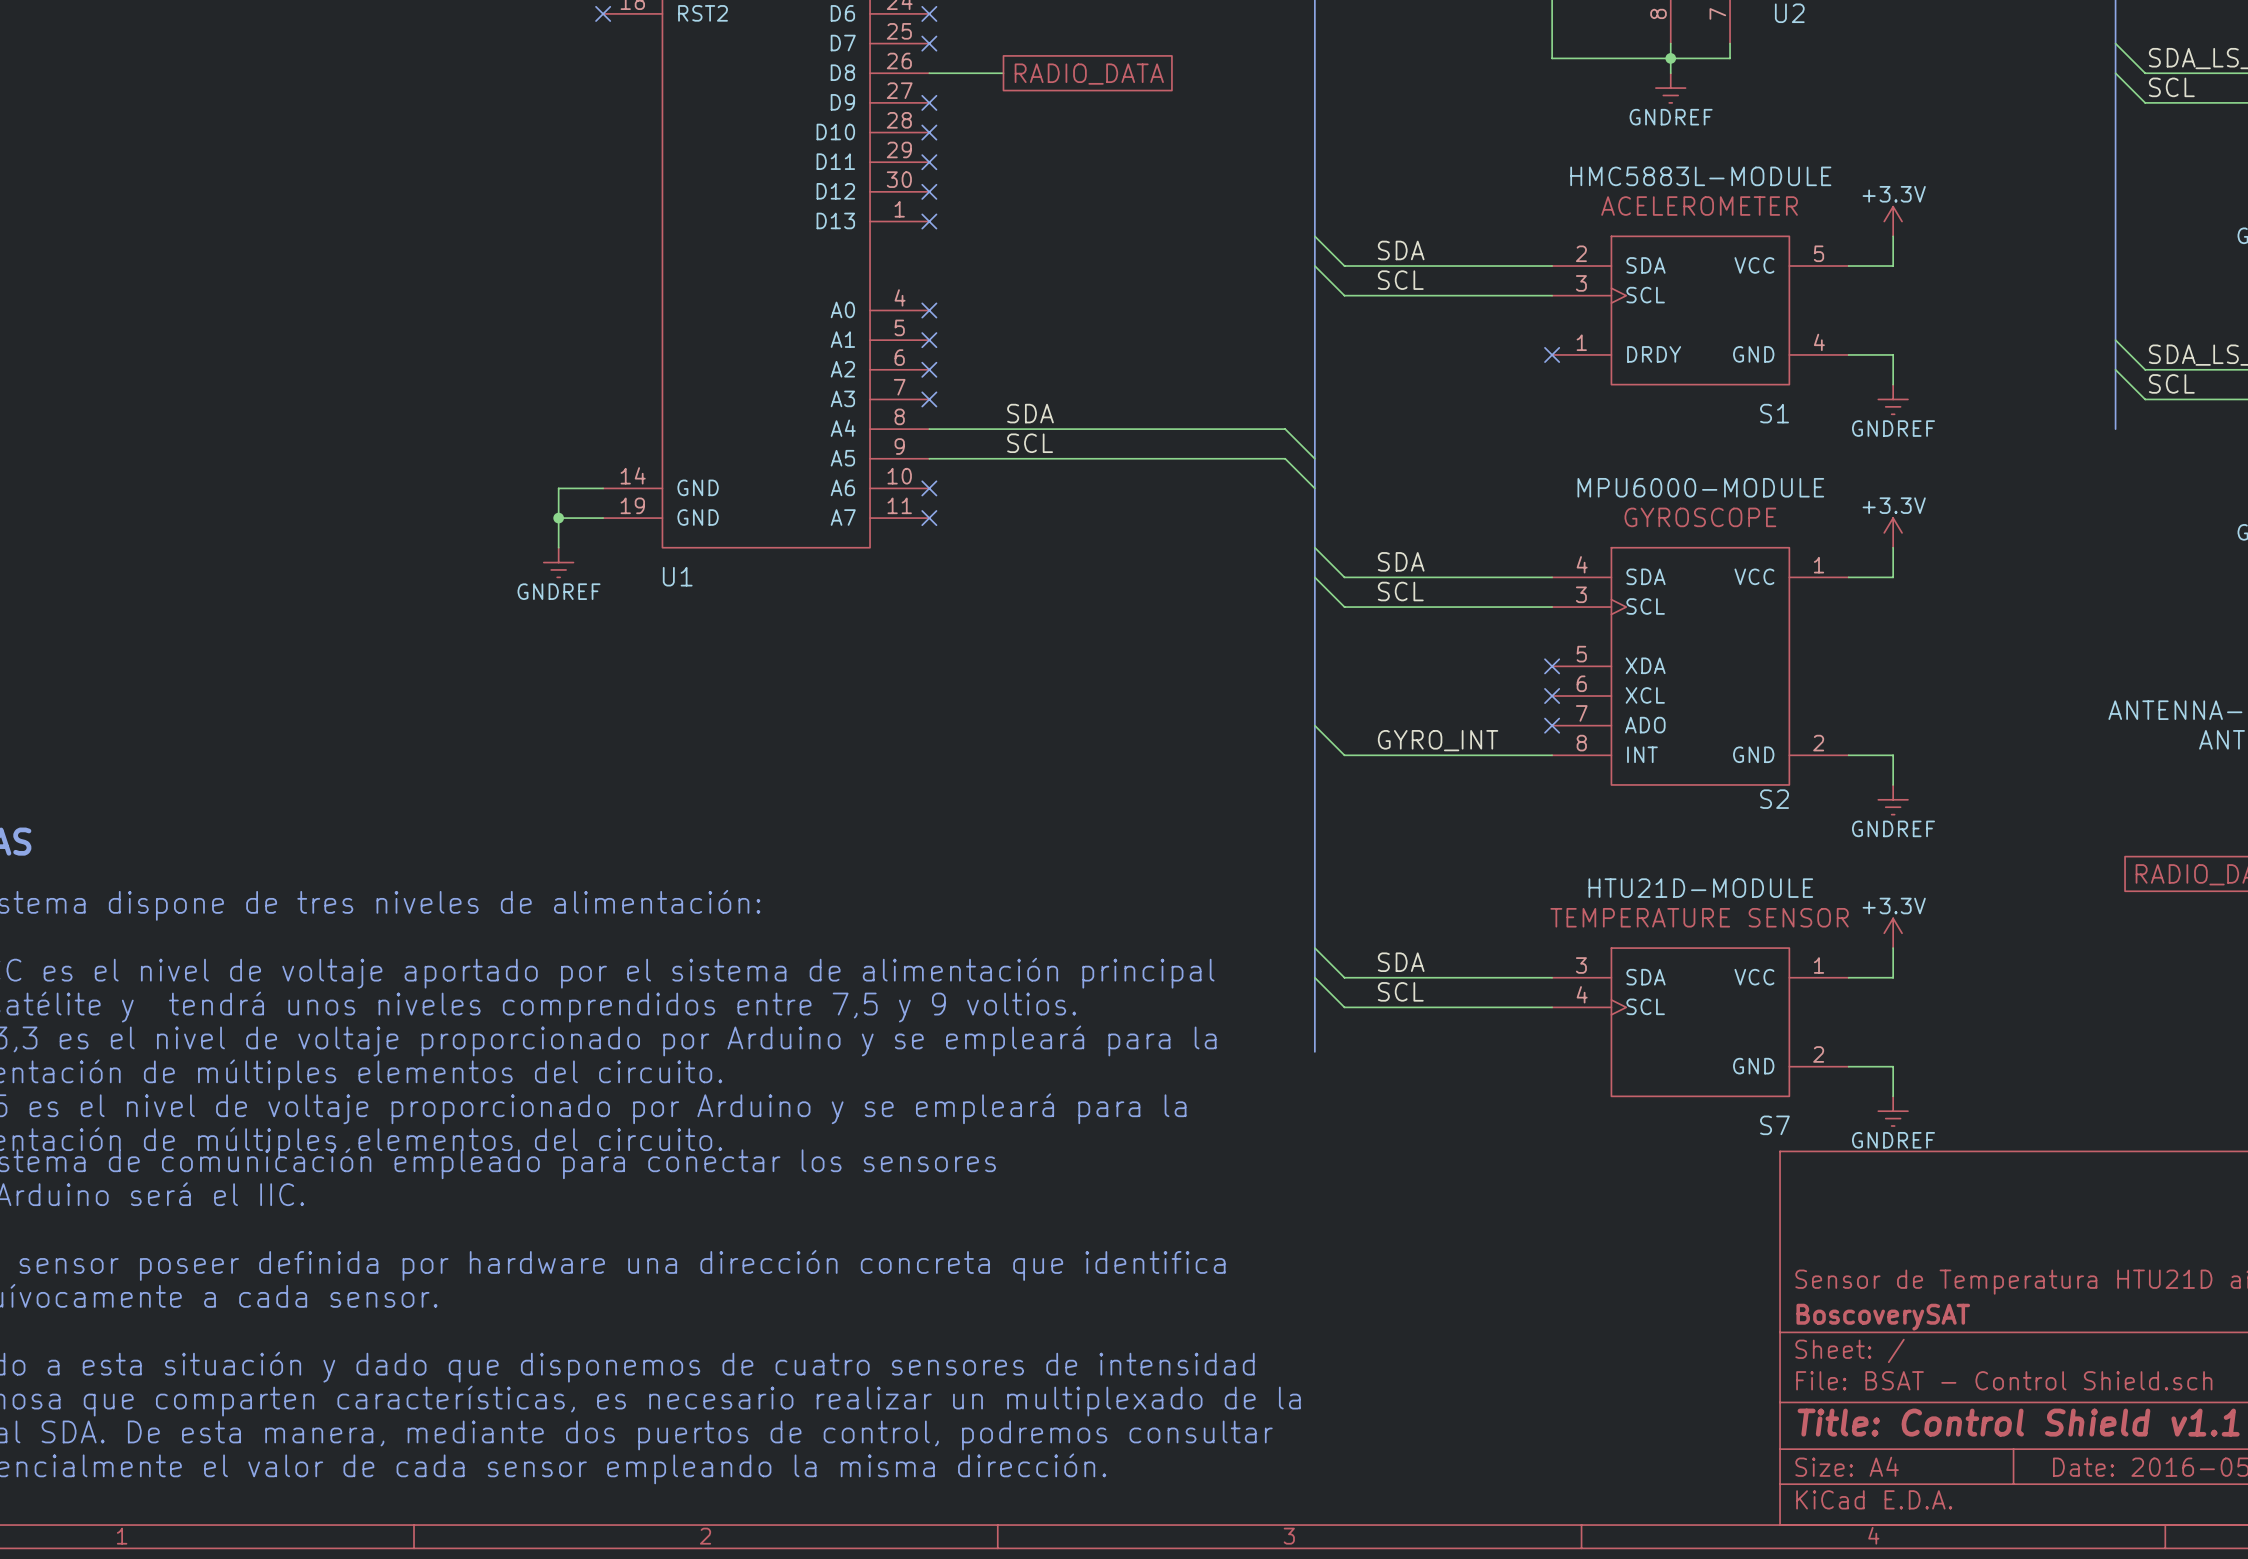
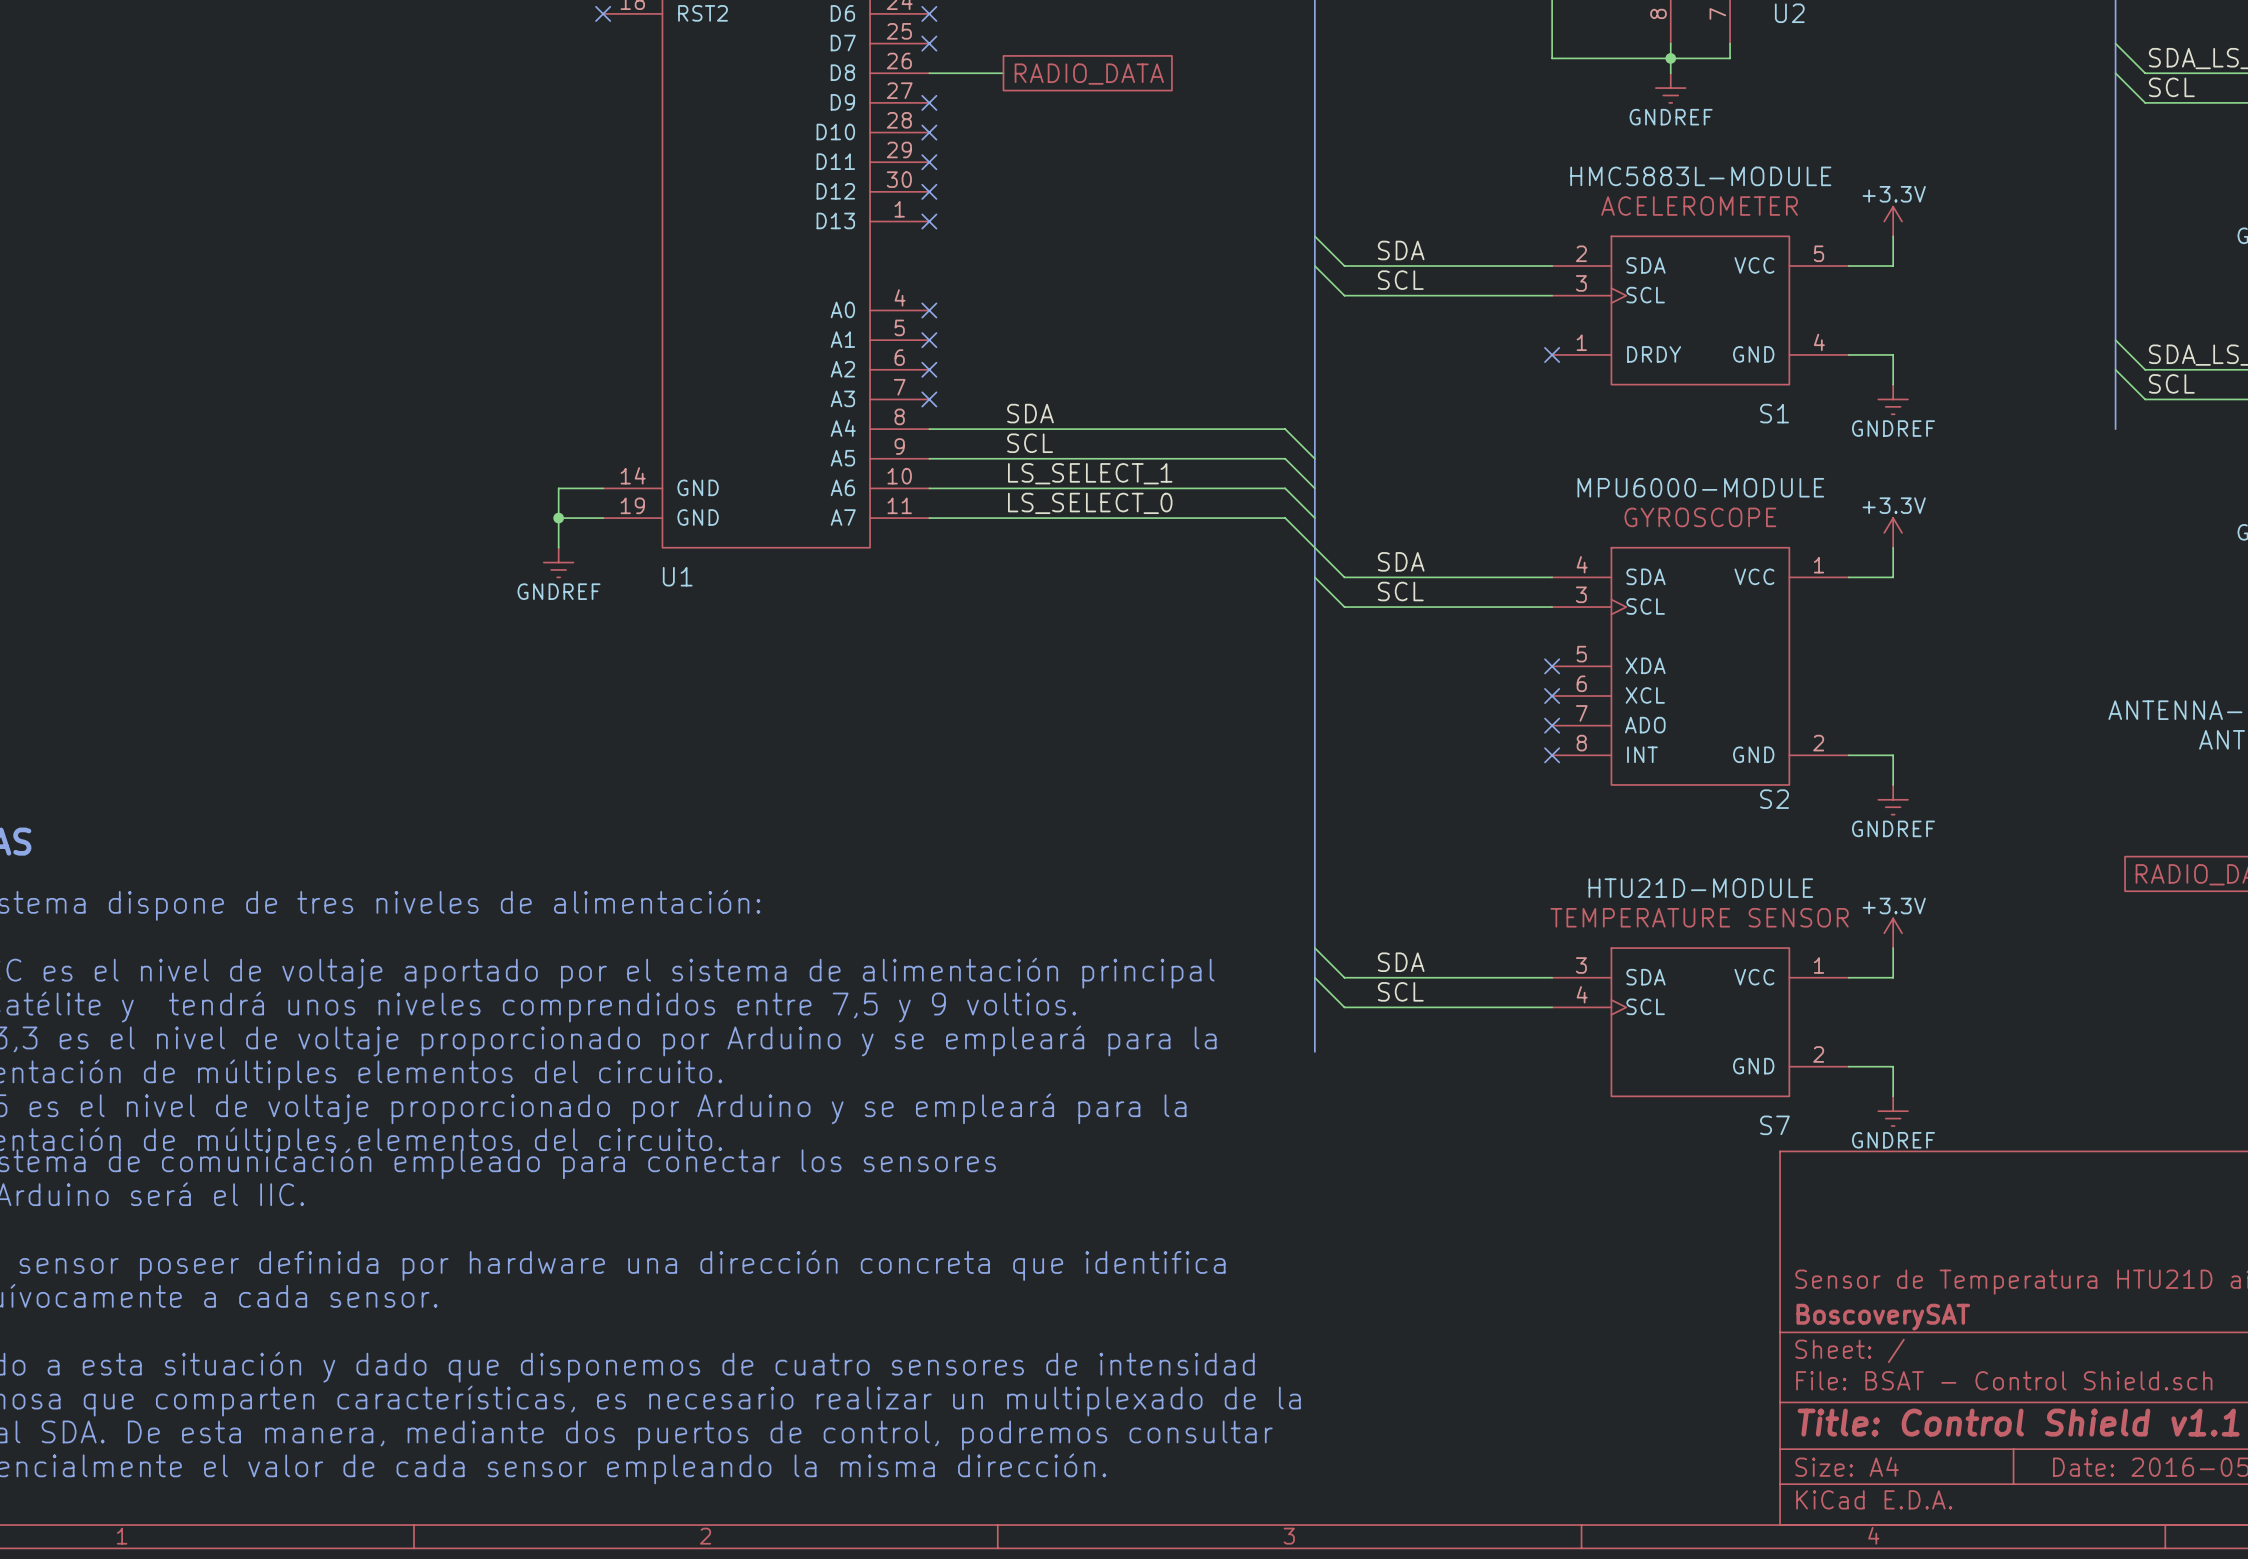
label: none -> LS_SELECT_1 (1090, 473)
wire: none -> (929, 488) (1285, 488) (1314, 518)
no-connect mark: (929, 488) -> none
label: none -> LS_SELECT_0 (1090, 503)
wire: none -> (929, 518) (1285, 518) (1314, 547)
no-connect mark: (929, 518) -> none
wire: (1314, 725) (1344, 755) (1552, 755) -> none
label: GYRO_INT (1438, 740) -> none
no-connect mark: none -> (1552, 755)

